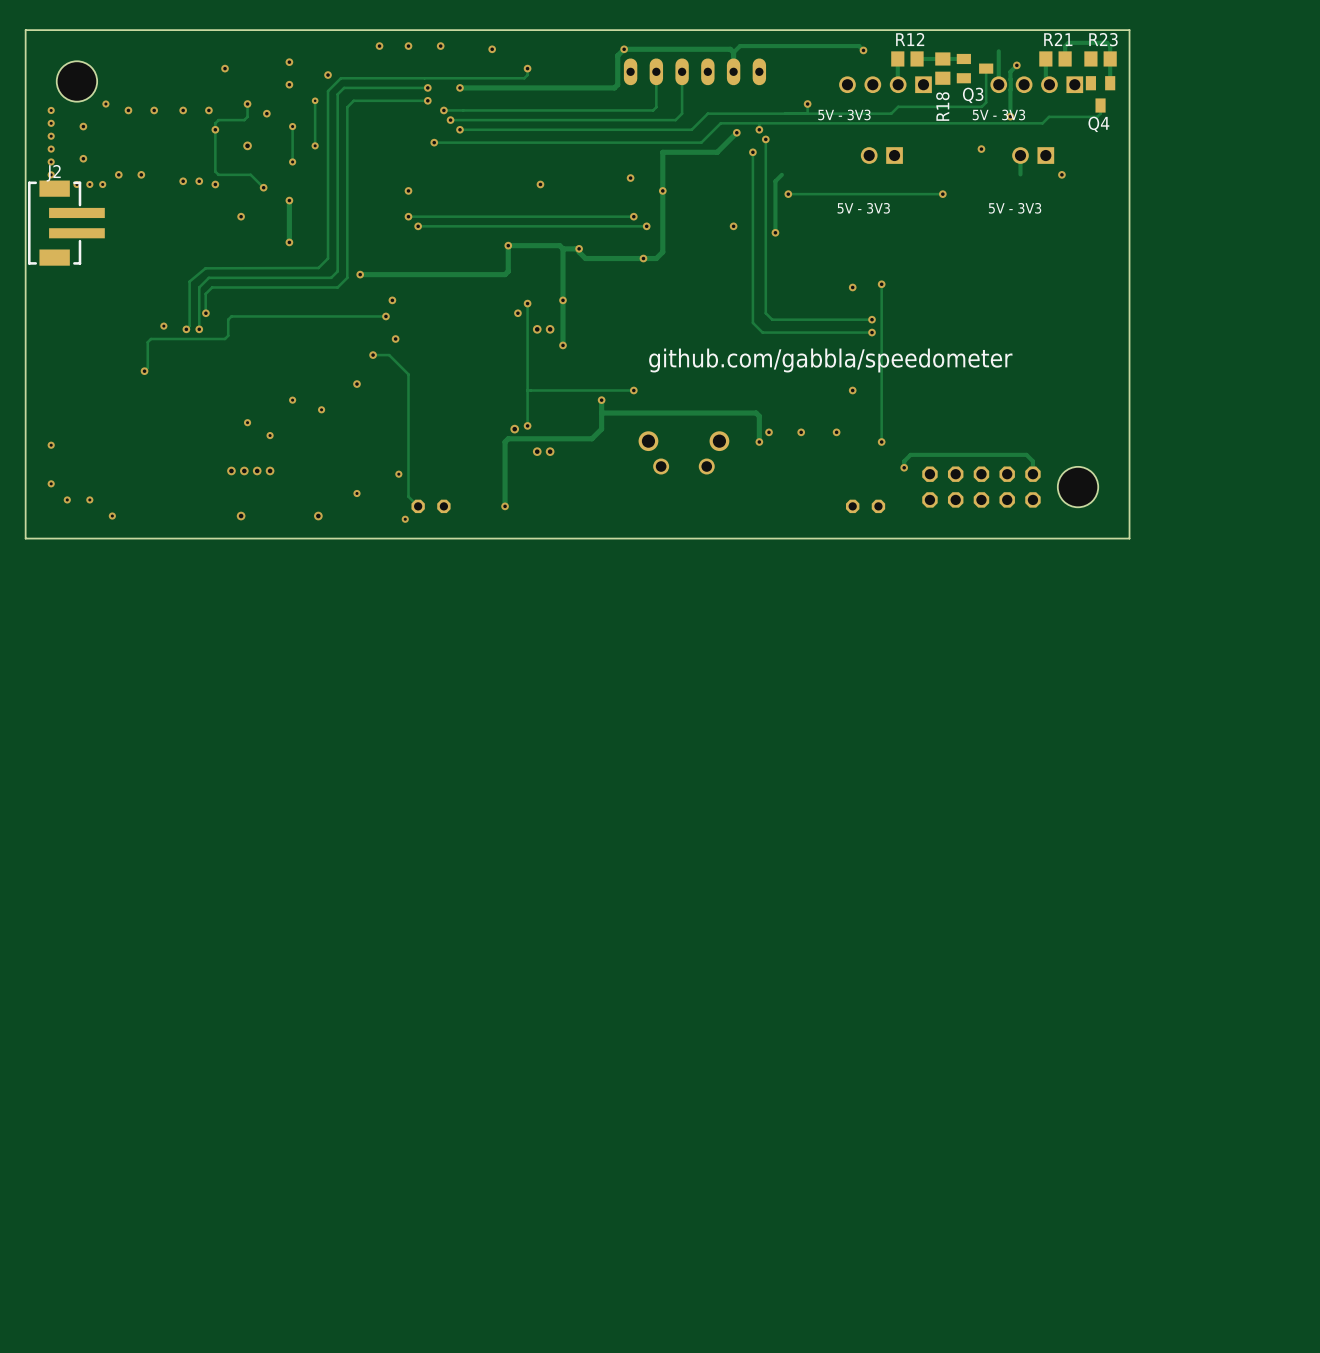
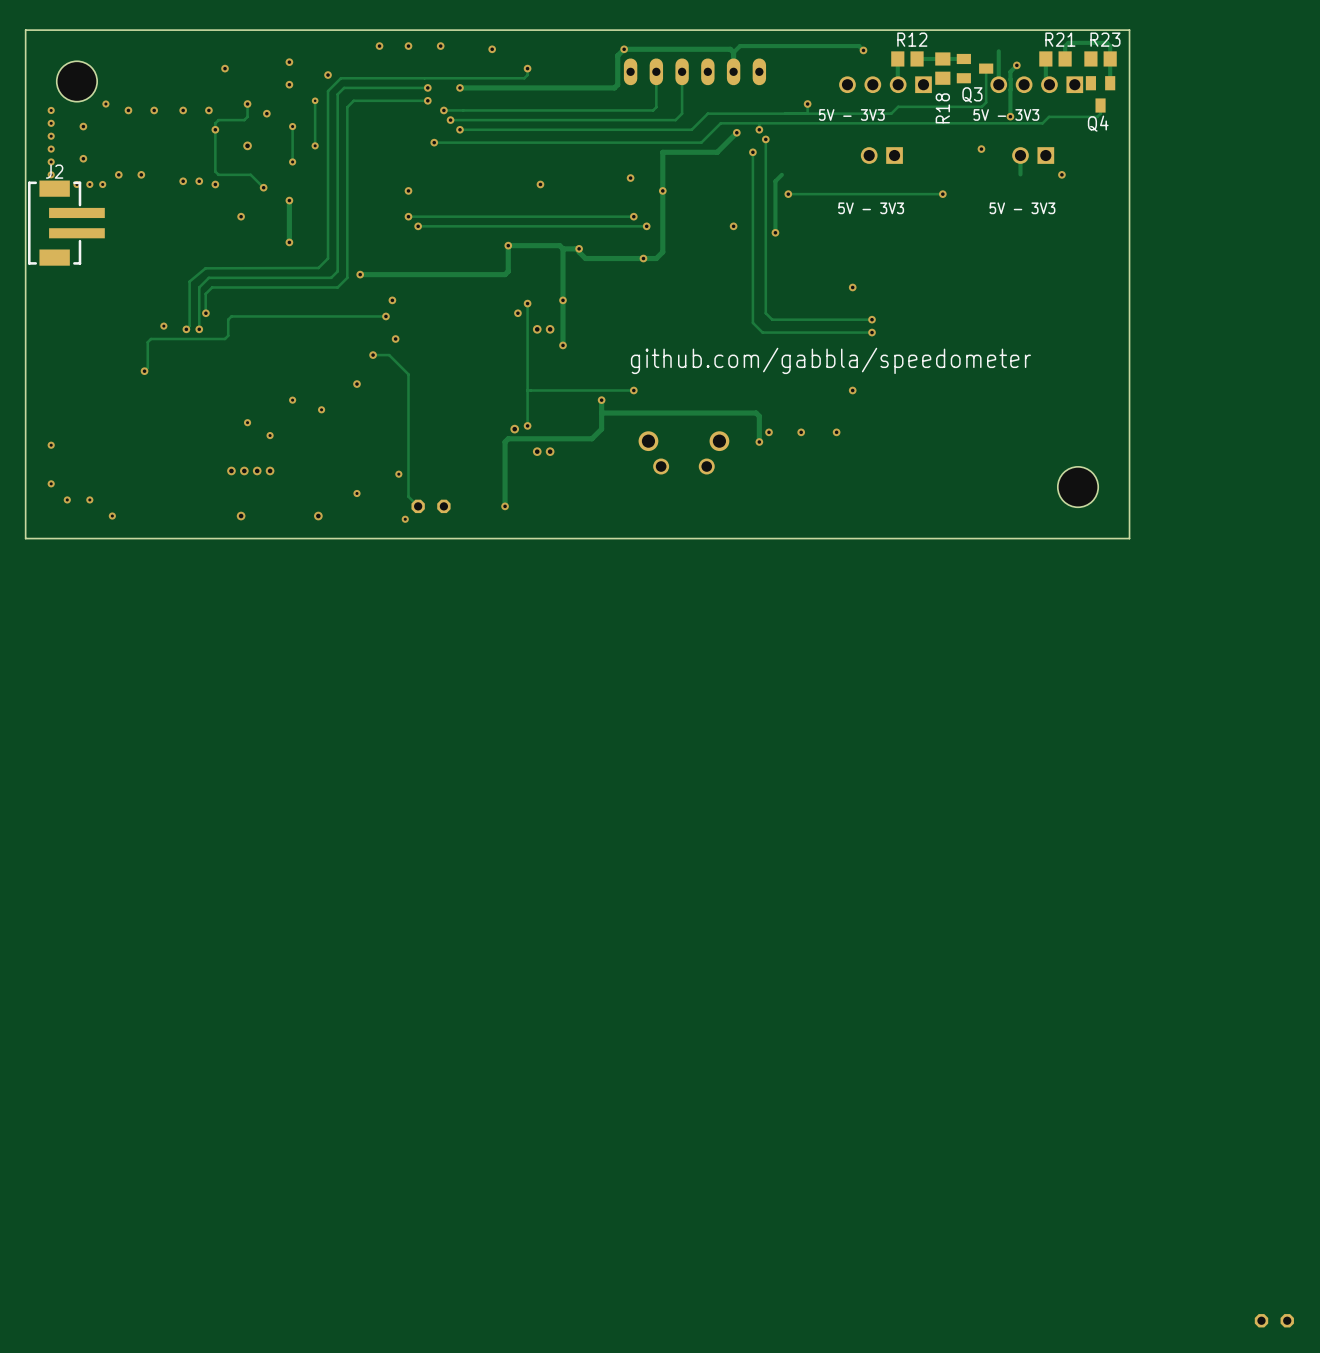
track: (881, 284) (881, 442) -> none
via: (881, 284) -> none
via: (881, 442) -> none
track: (904, 467) (904, 461) (910, 454) (1026, 454) (1032, 461) (1032, 474) -> none
via: (904, 467) -> none
part: (981, 487) -> none
part: (865, 506) -> none
part: none -> (1274, 1320)

